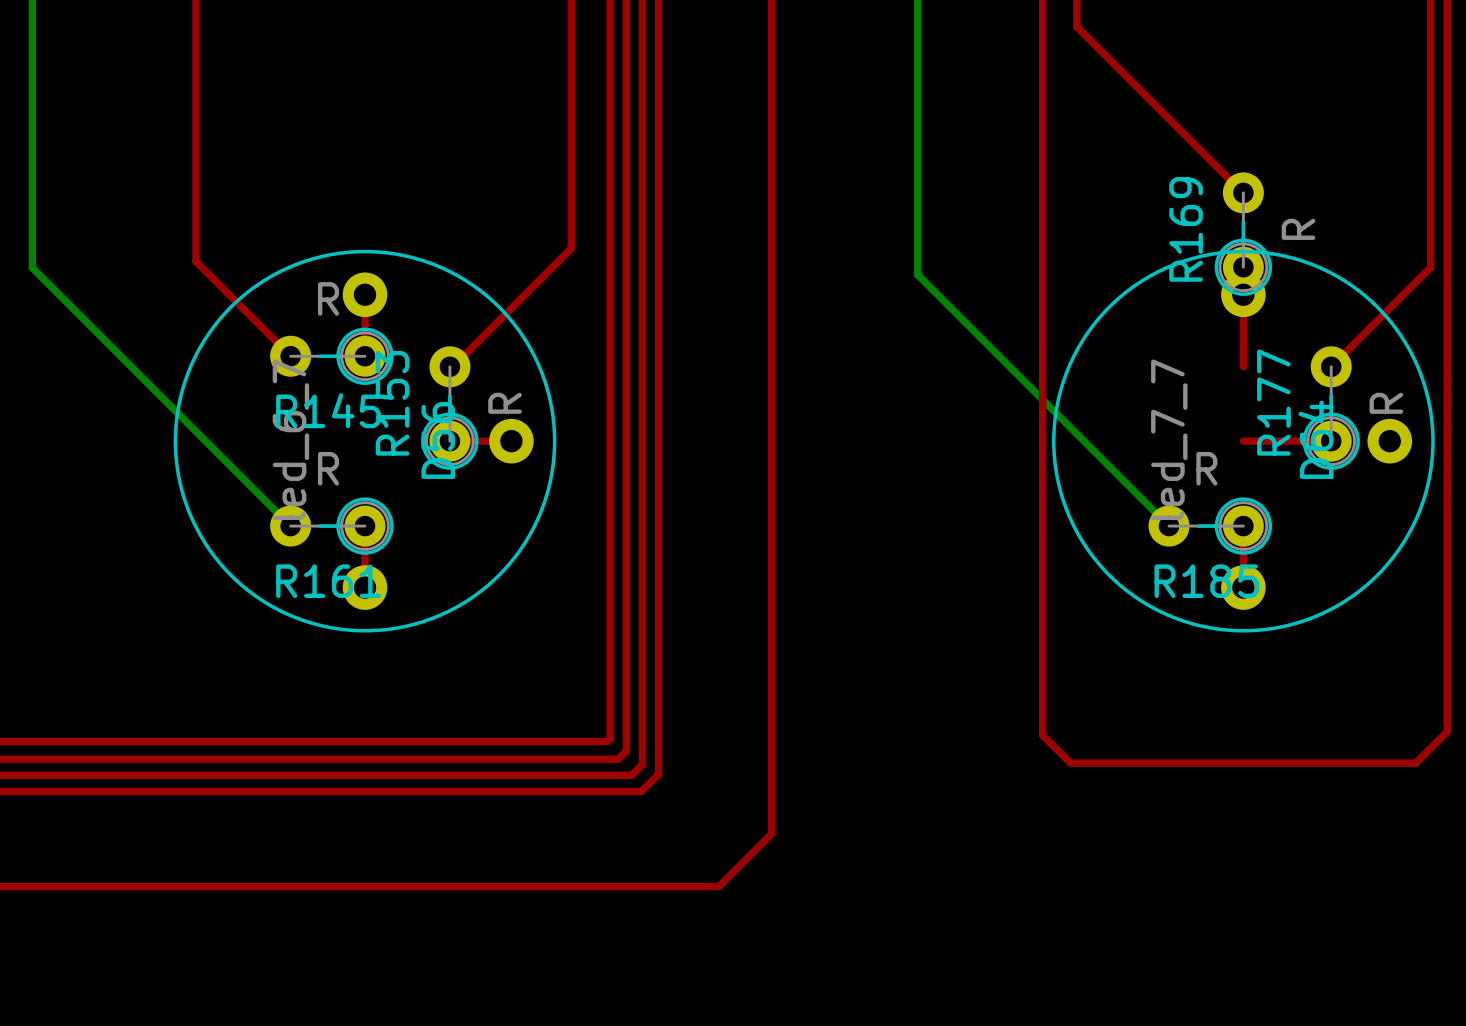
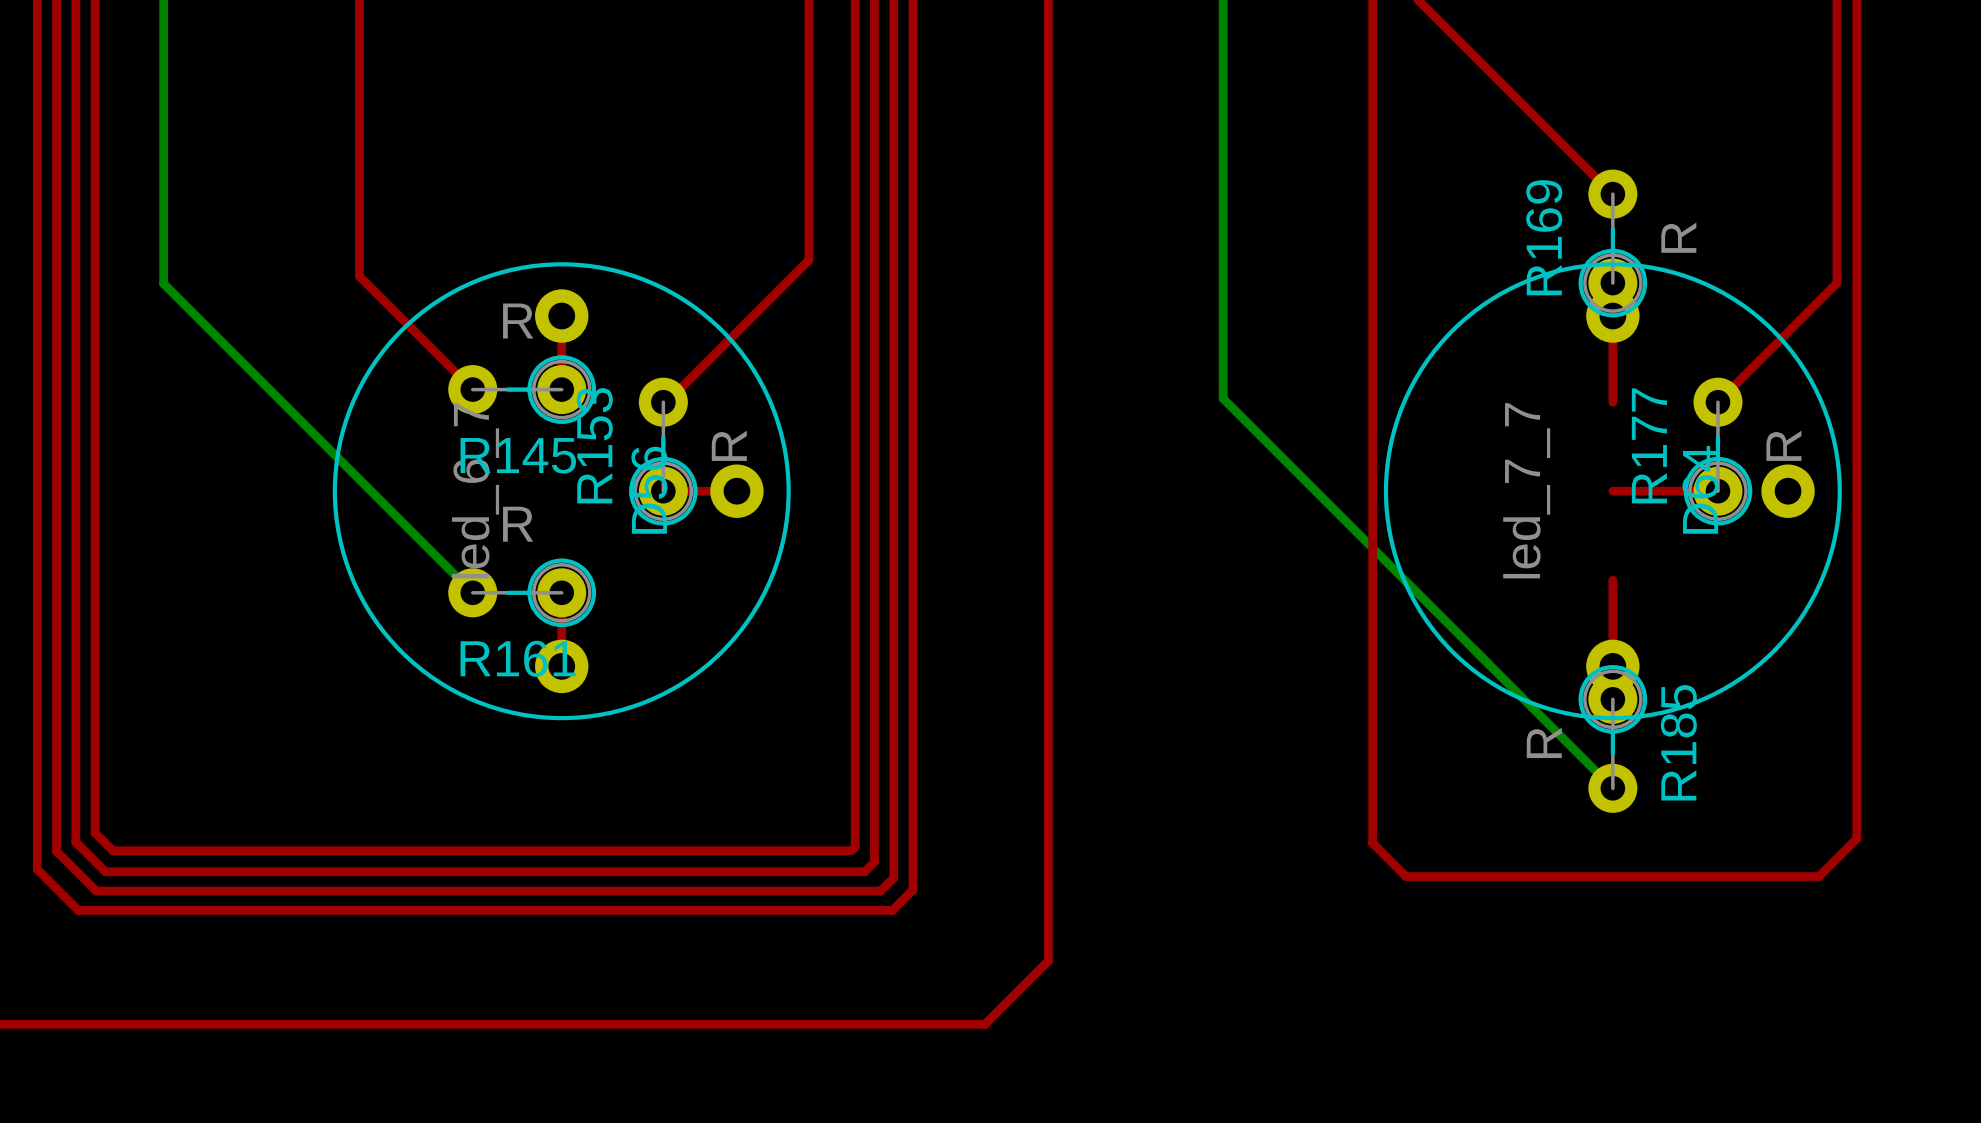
bottom track: (917, 274) (1169, 526) -> (1223, 292) (1223, 398) (1612, 788)
top track: none -> (1612, 580) (1612, 592)
R185 rotation: 0° (1210, 526) -> 90° counterclockwise (1612, 738)
R185 position: (1210, 526) -> (1612, 738)

